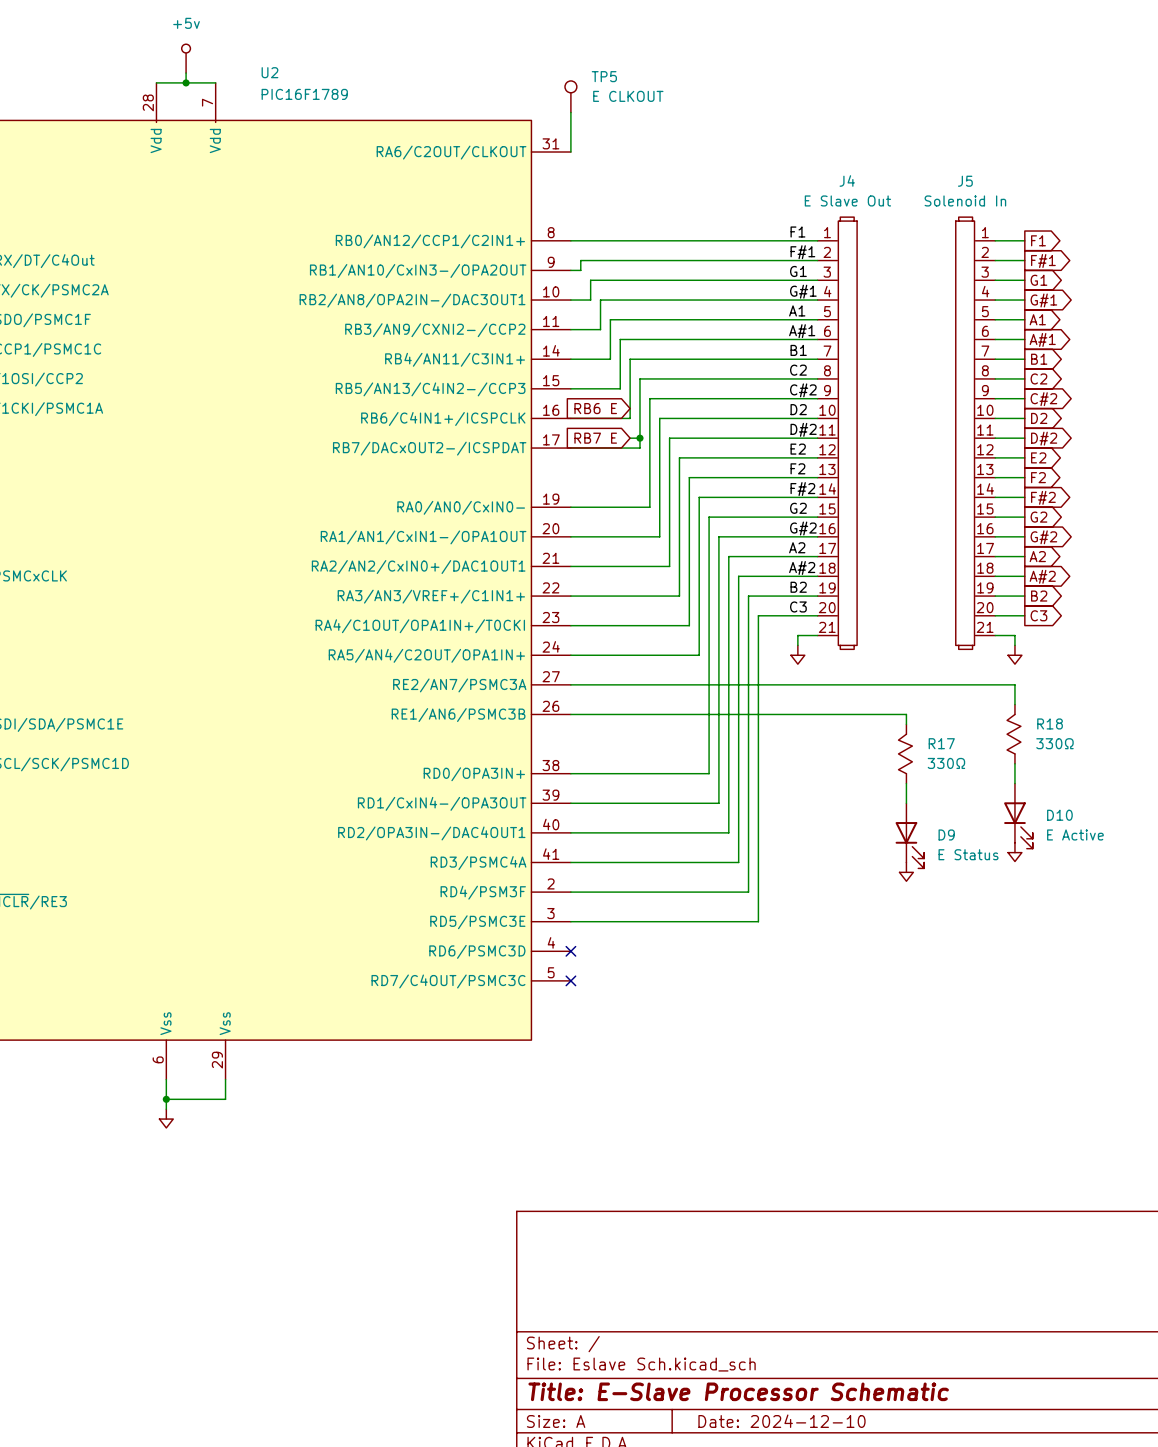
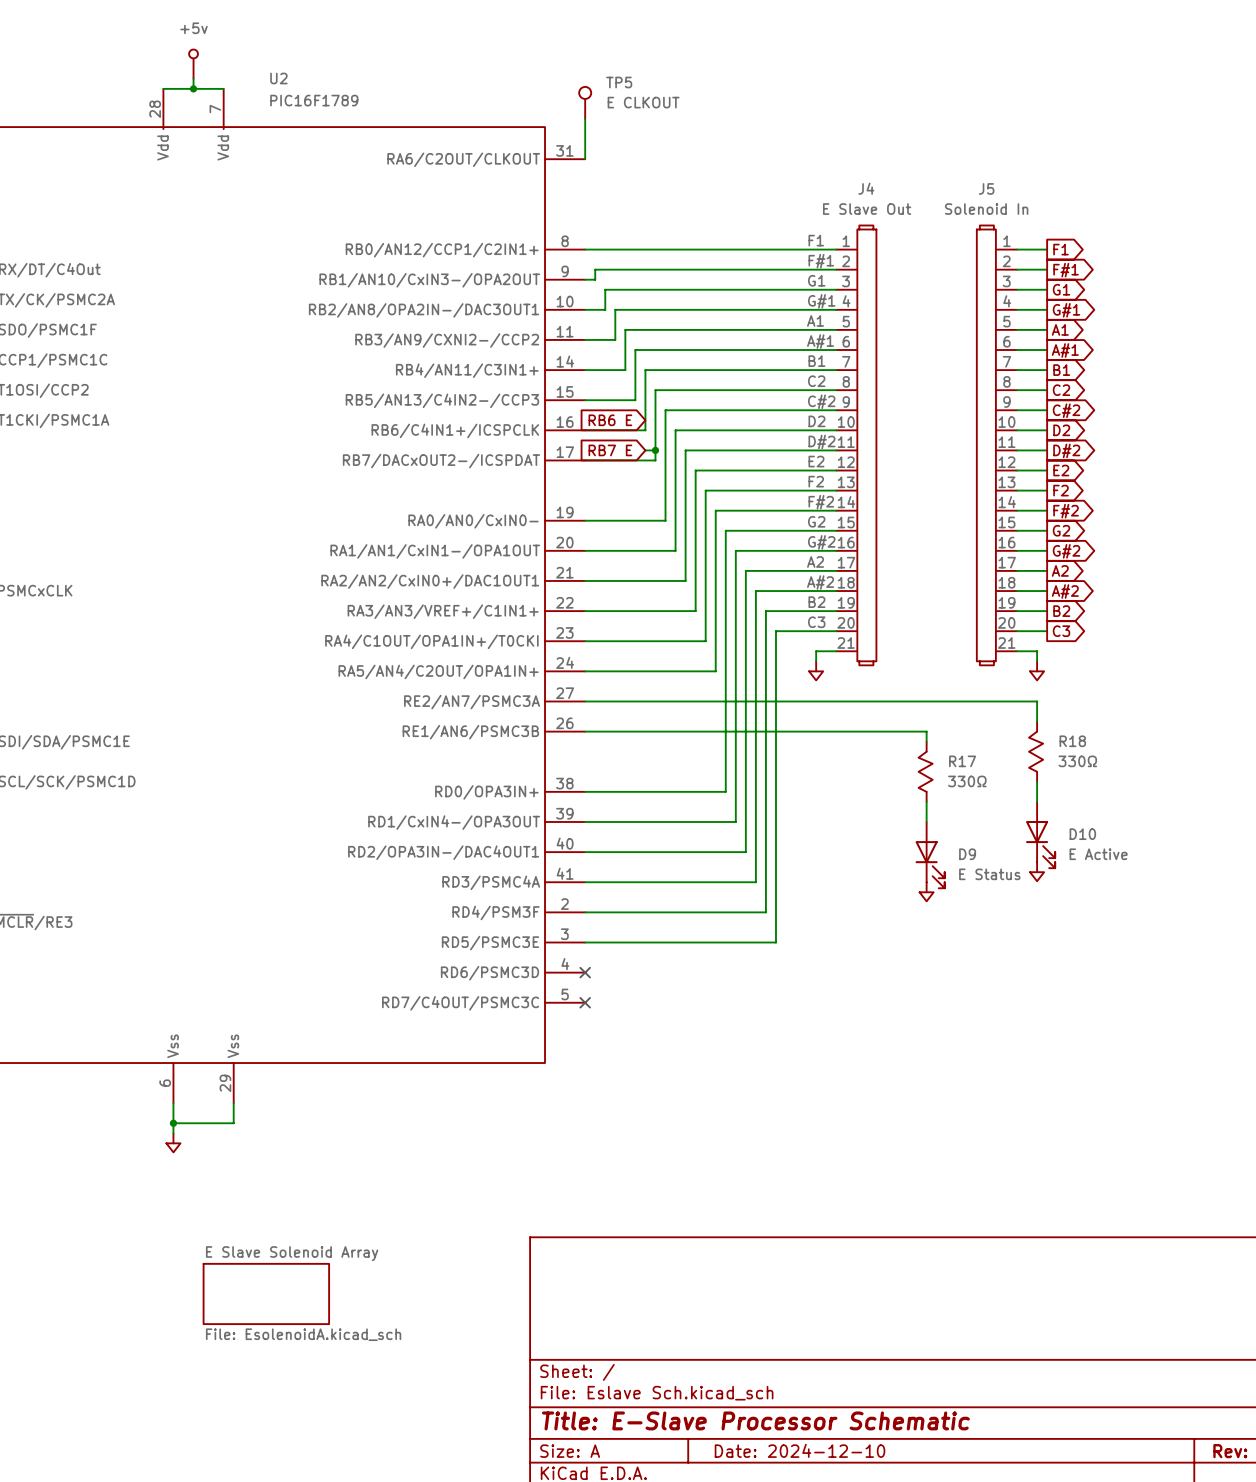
sheet E Slave Solenoid Array: none -> File: EsolenoidA.kicad_sch (266, 1293)

